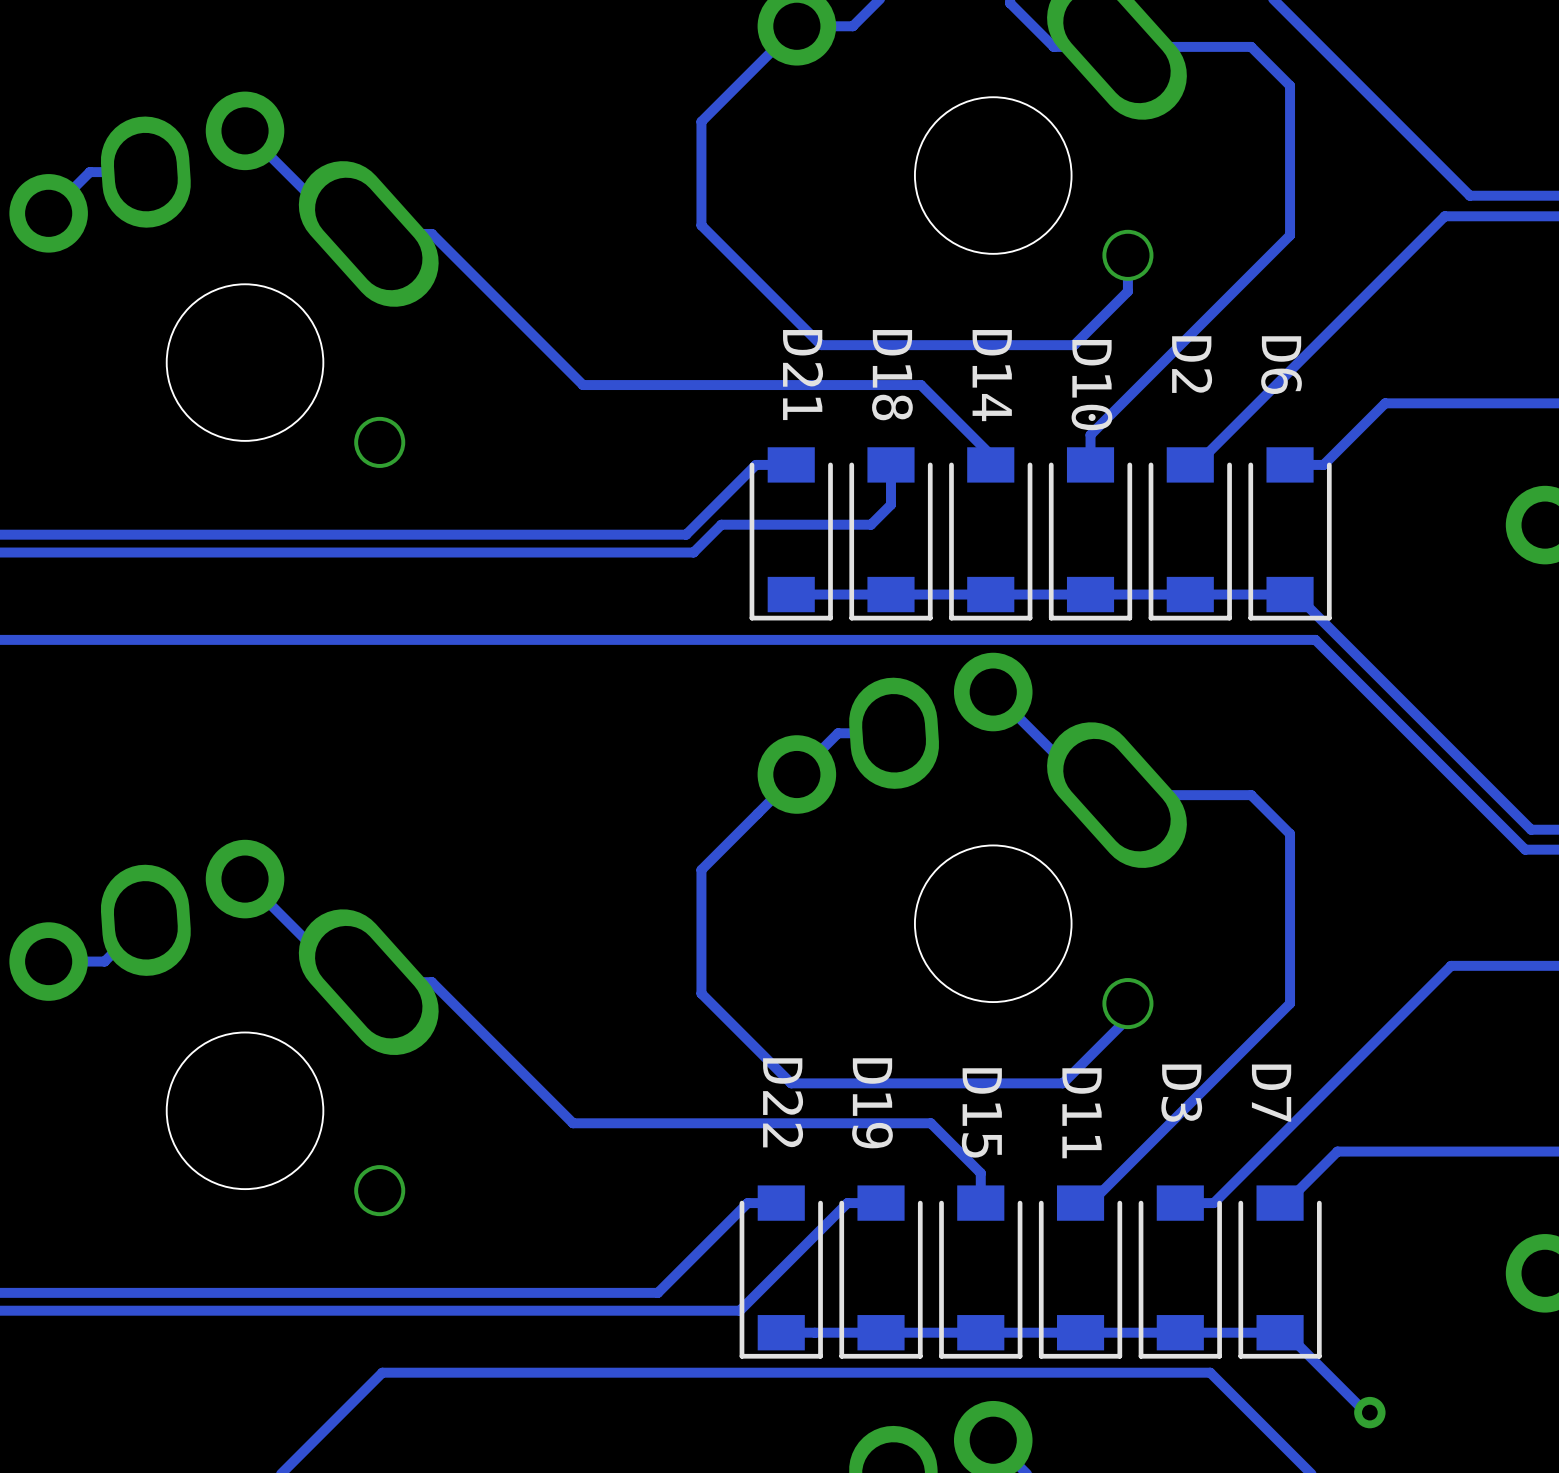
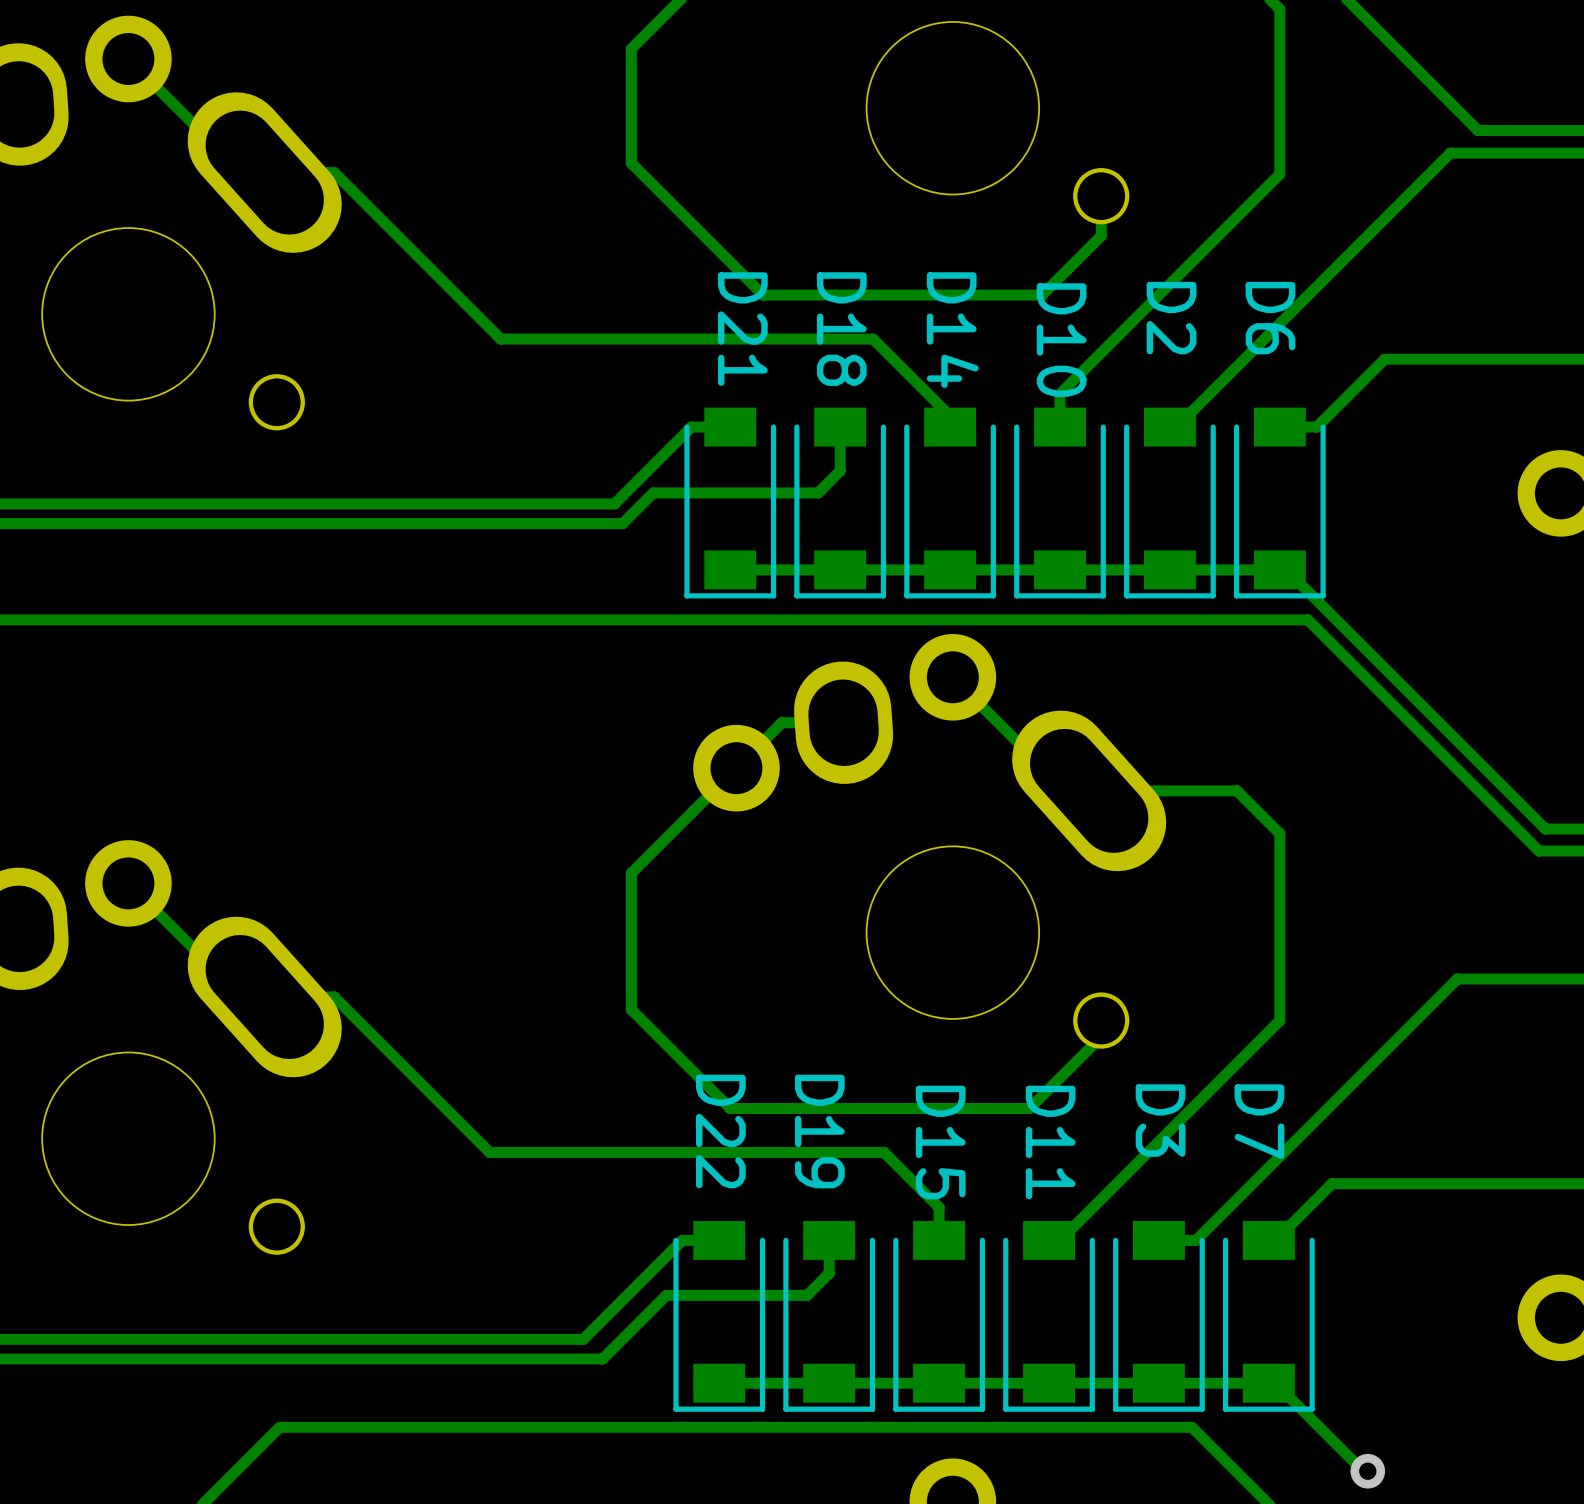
track: (881, 1203) (847, 1203) (739, 1310) (675, 1310) -> (829, 1240) (829, 1273) (807, 1295) (666, 1295) (602, 1359)

